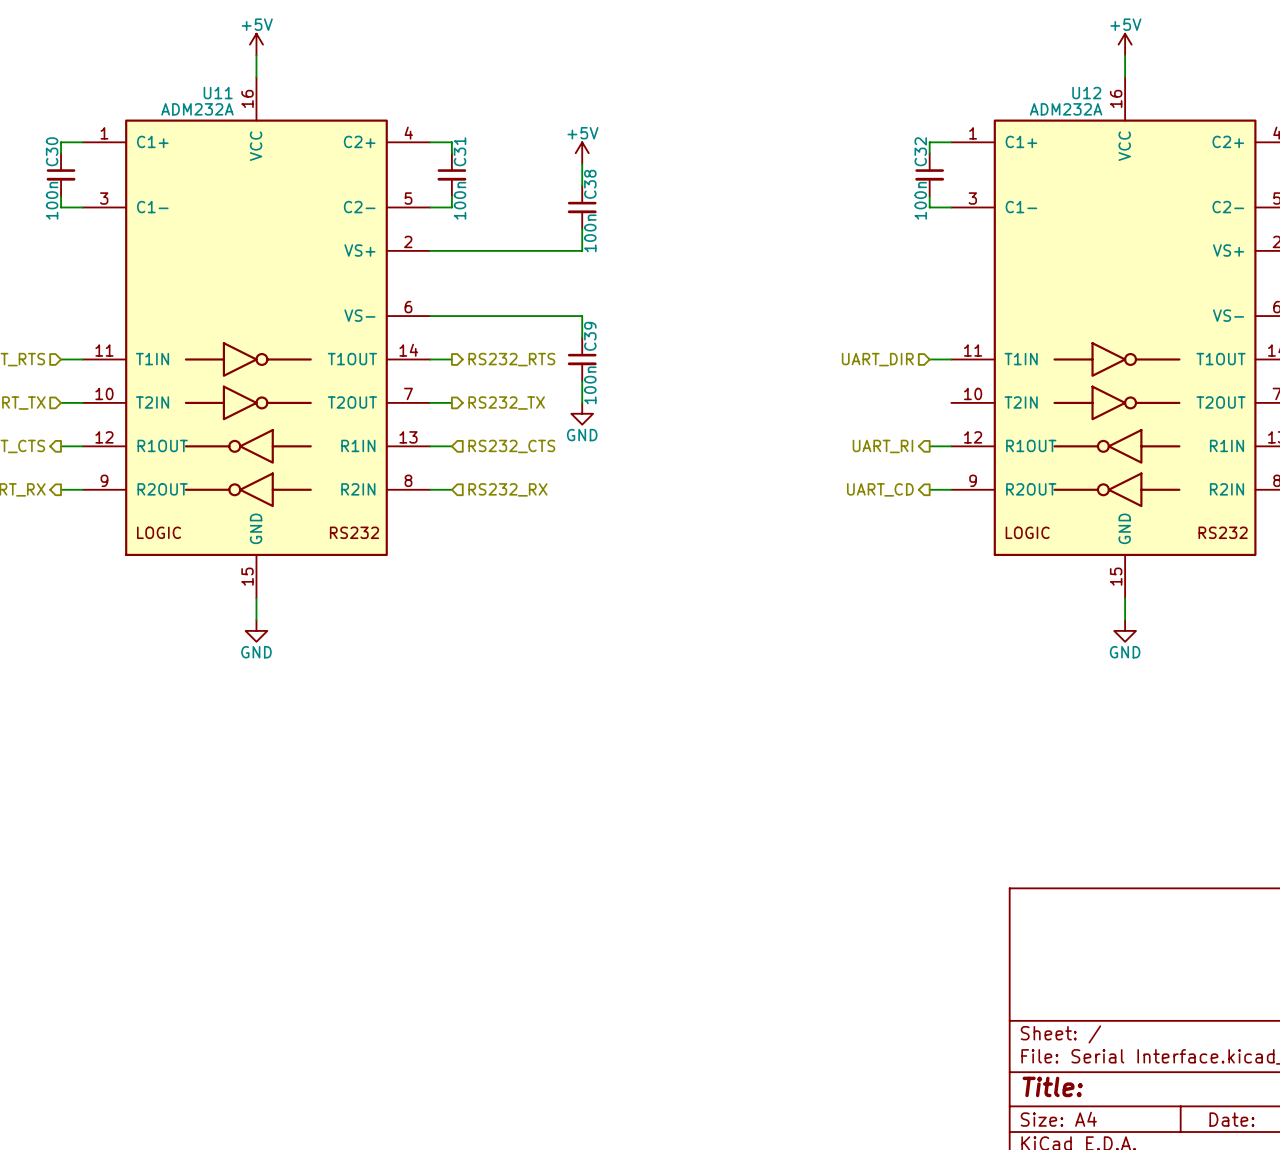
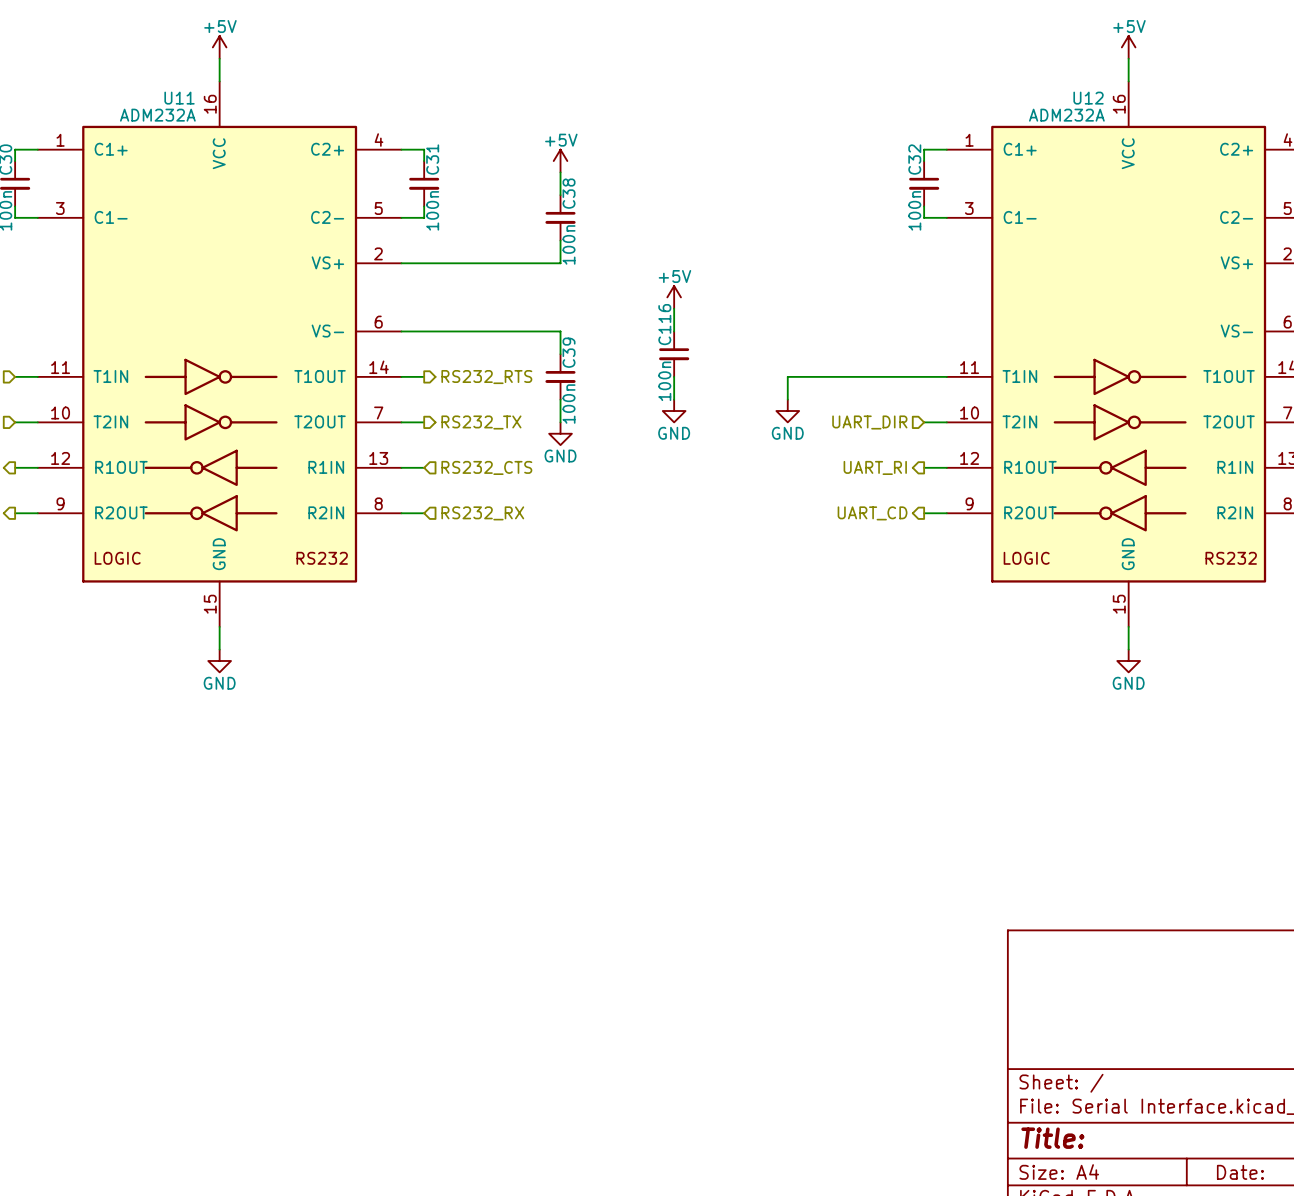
power symbol: none -> +5V (674, 297)
wire: none -> (674, 308) (674, 331)
C116: none -> 100n (674, 354)
wire: none -> (674, 376) (674, 399)
hierarchical label position: UART_DIR (877, 359) -> UART_DIR (869, 422)
wire: none -> (924, 376) (787, 376) (787, 399)
power symbol: none -> GND (674, 411)
power symbol: none -> GND (787, 411)
wire: none -> (924, 422) (946, 422)

